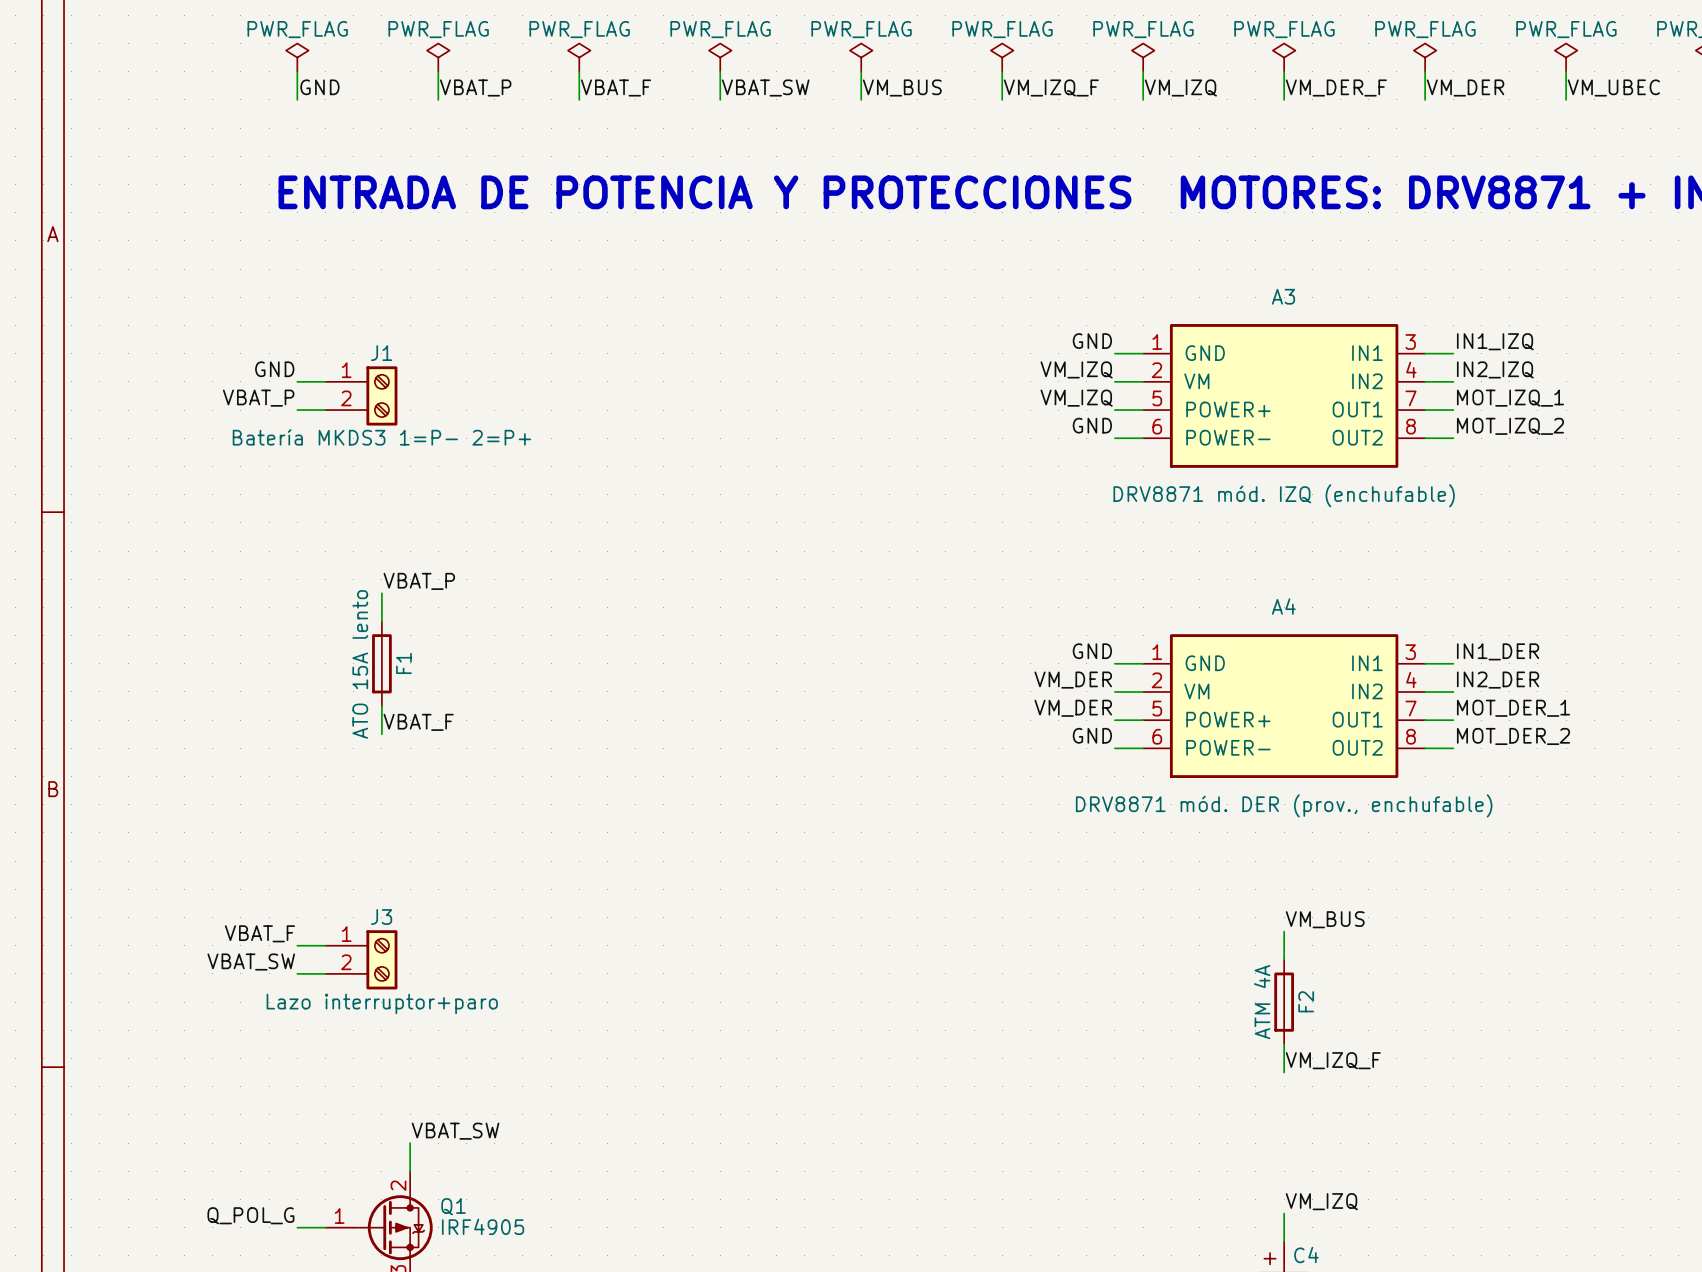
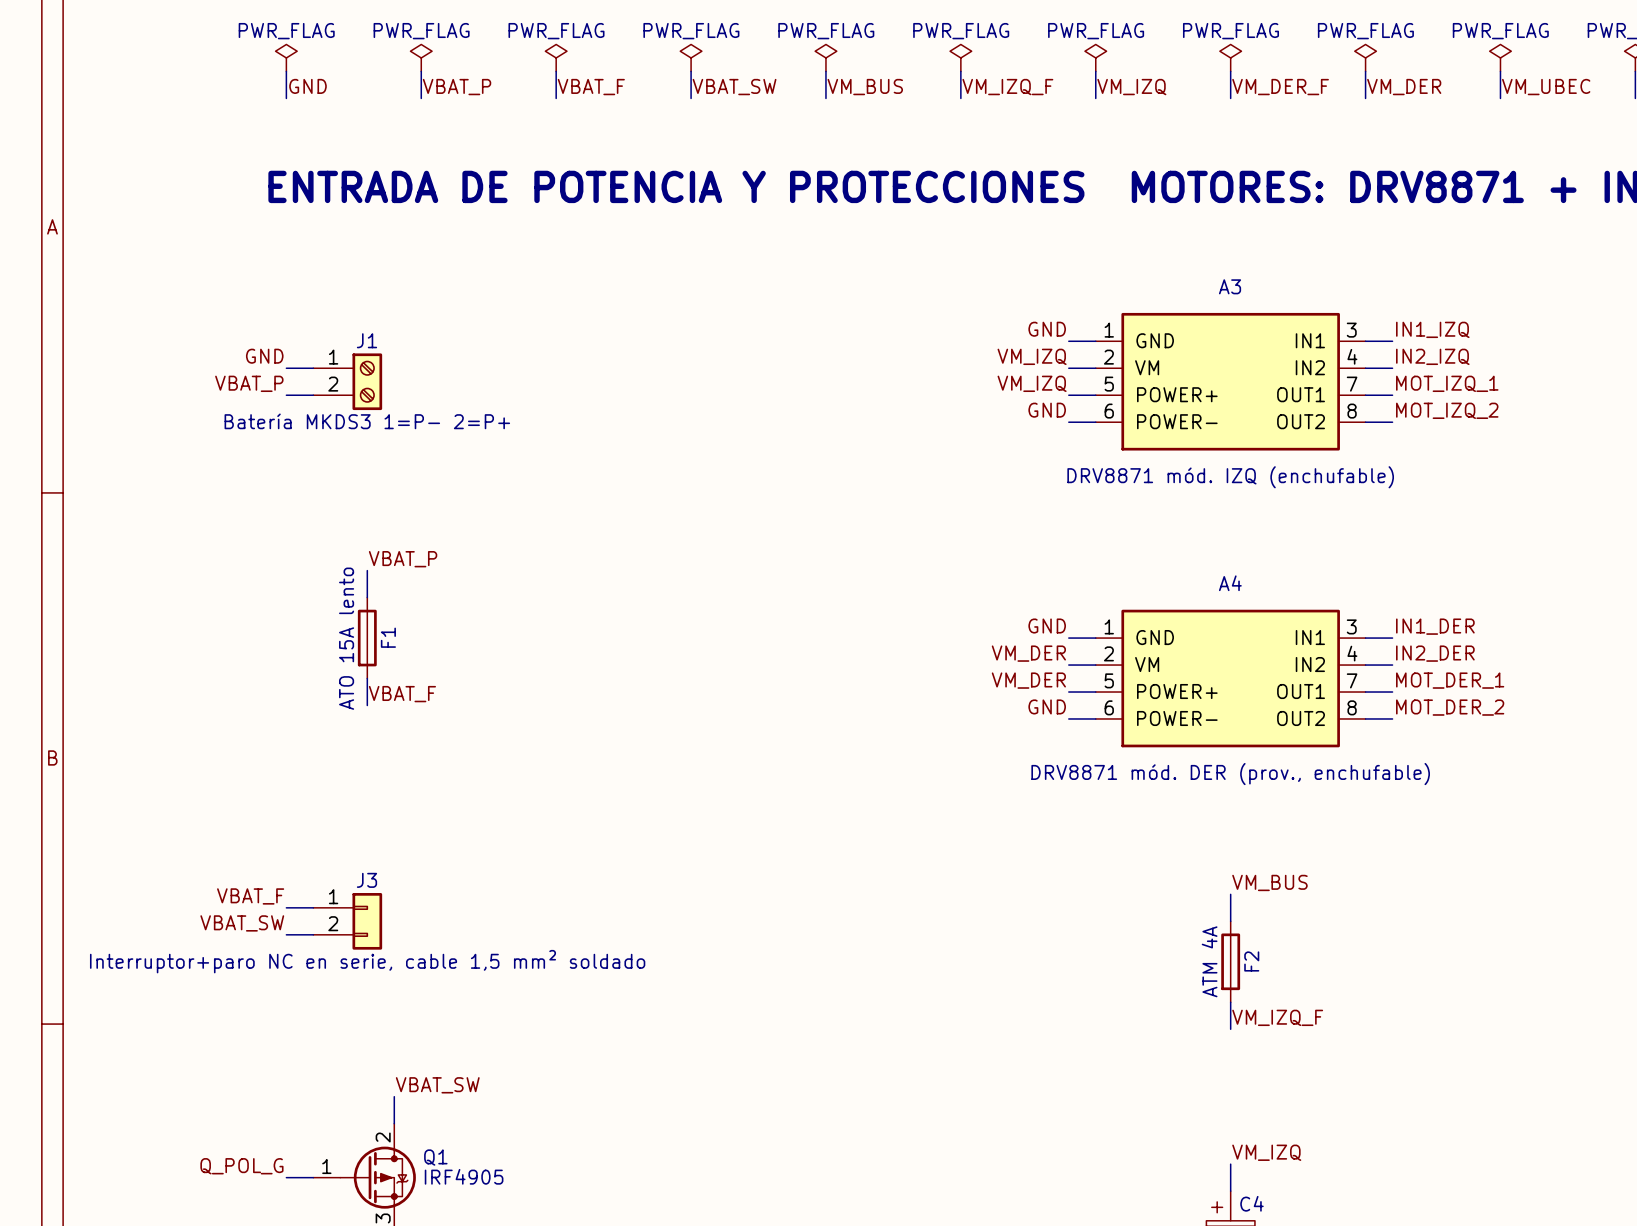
J3 symbol: [325, 930, 398, 990] -> [313, 893, 383, 950]
J3 value: Lazo interruptor+paro (382, 1003) -> Interruptor+paro NC en serie, cable 1,5 mm² soldado (367, 961)

